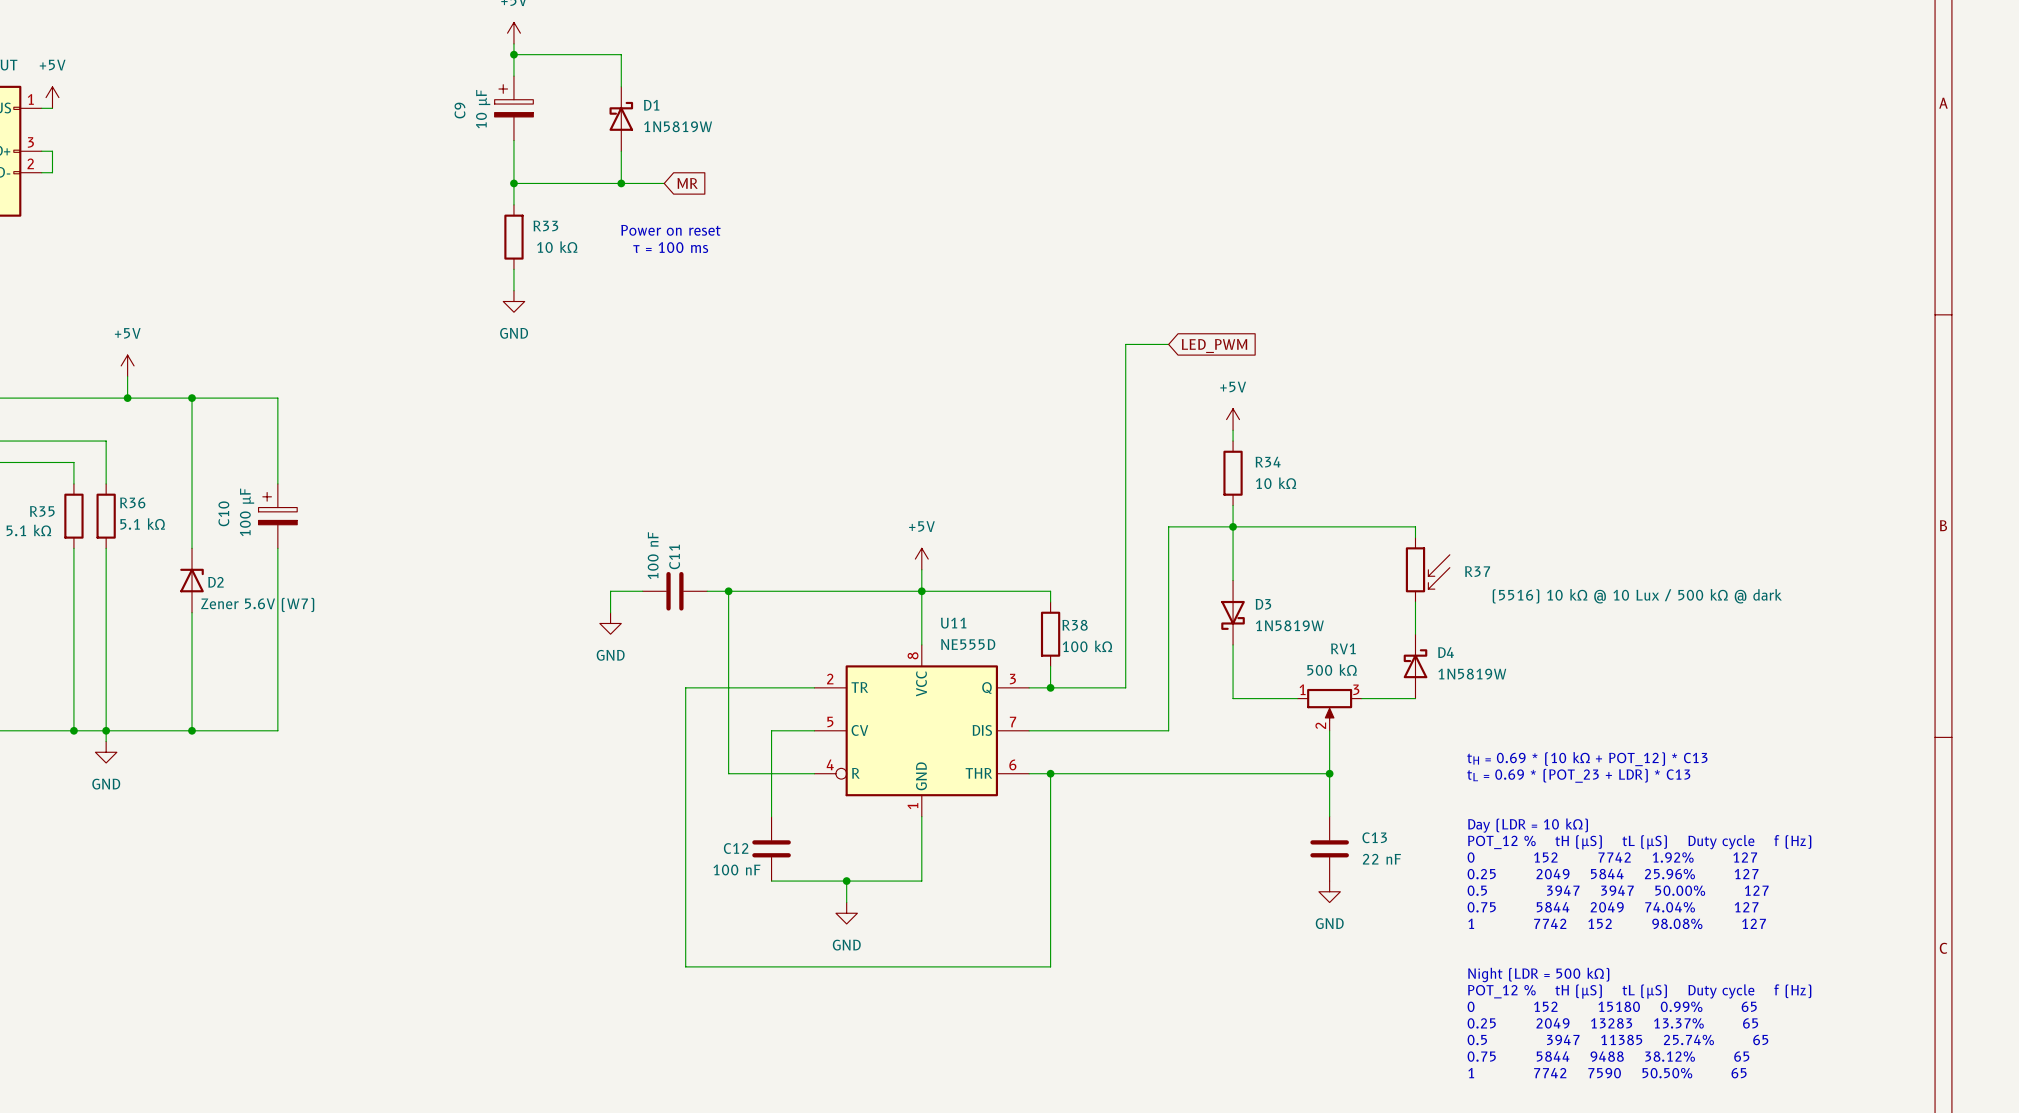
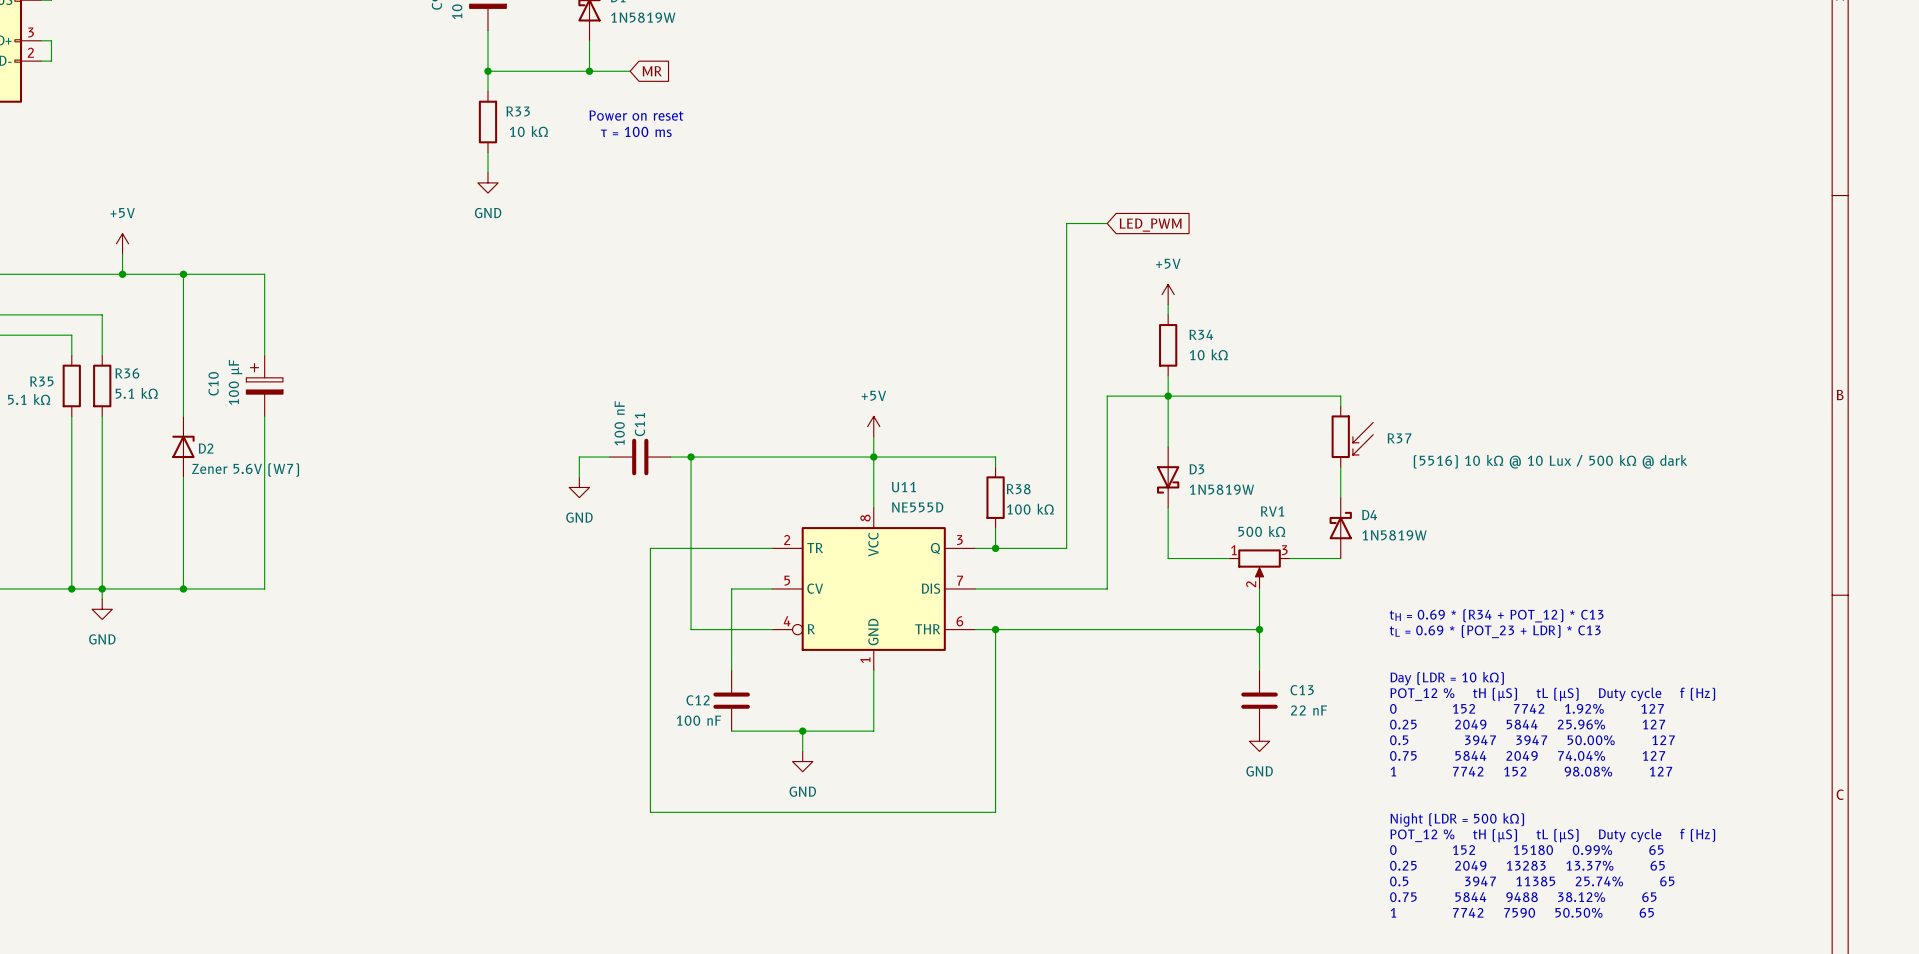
text: tH = 0.69 * (10 kΩ + POT_12) * C13 (1587, 759) -> tH = 0.69 * (R34 + POT_12) * C13 (1496, 615)

